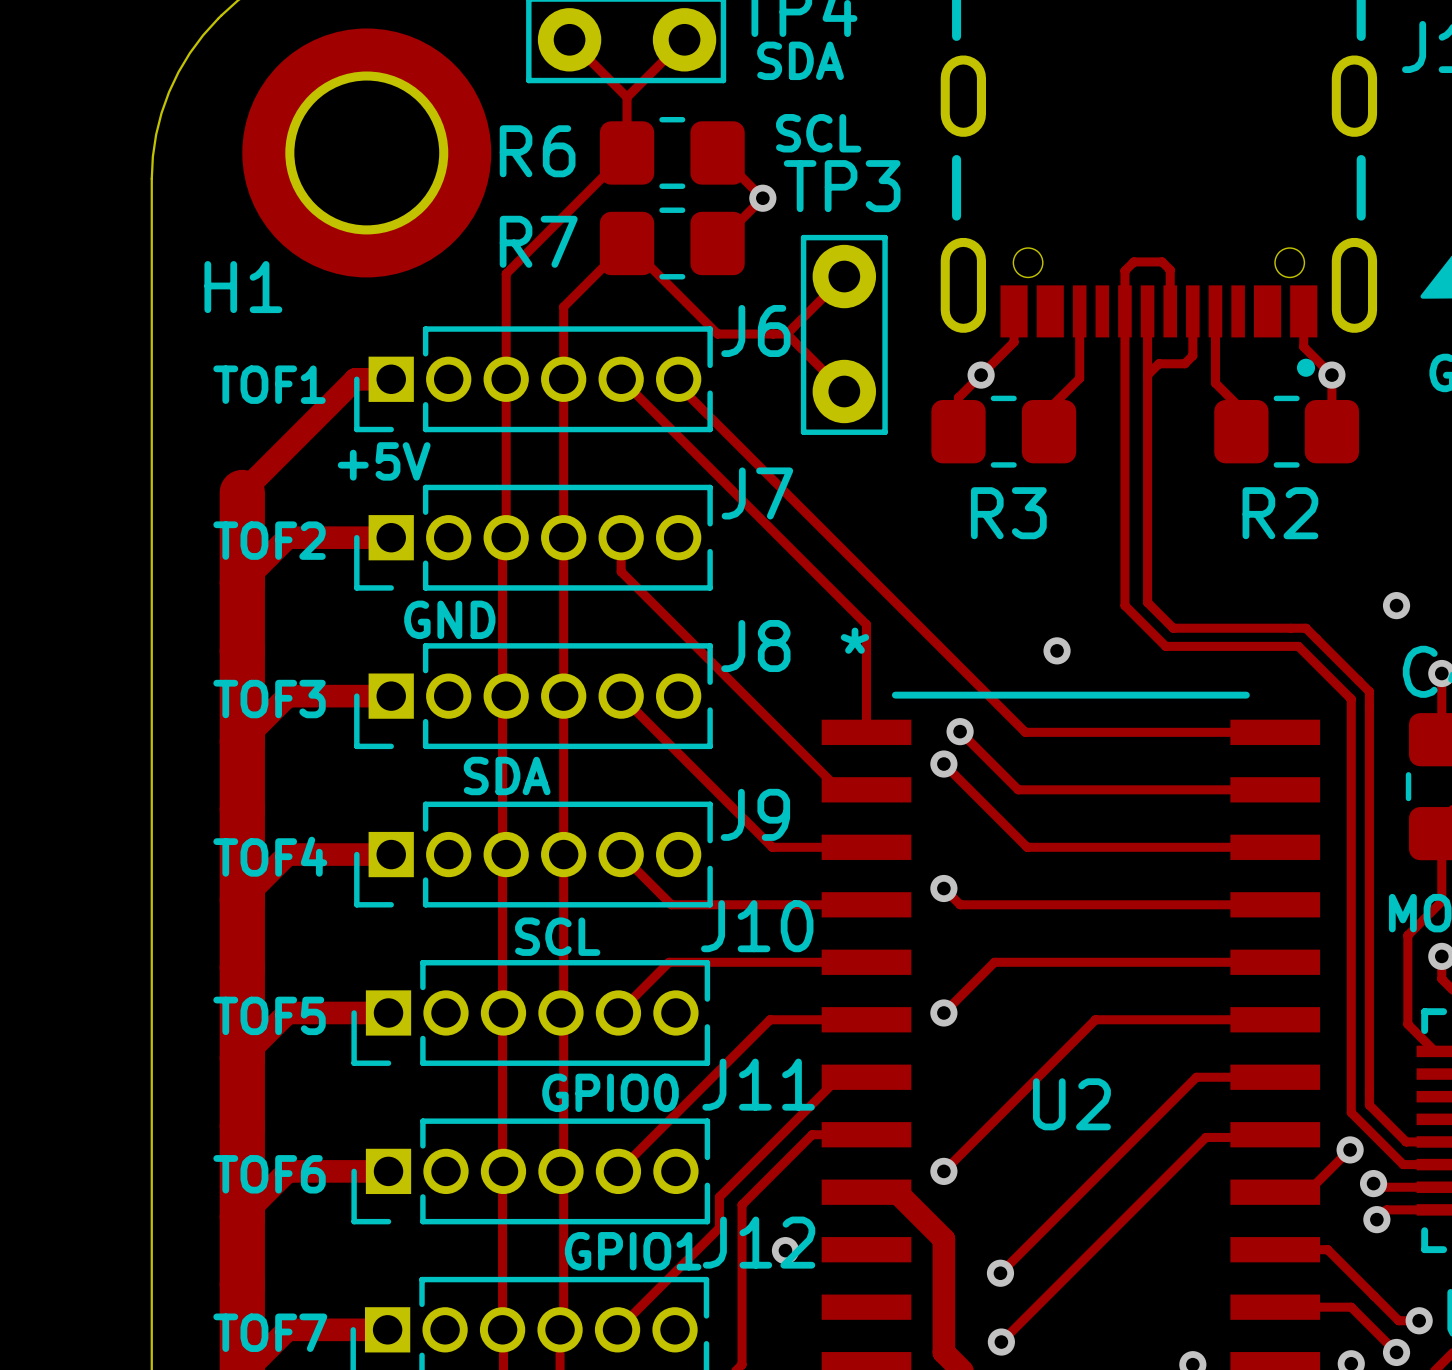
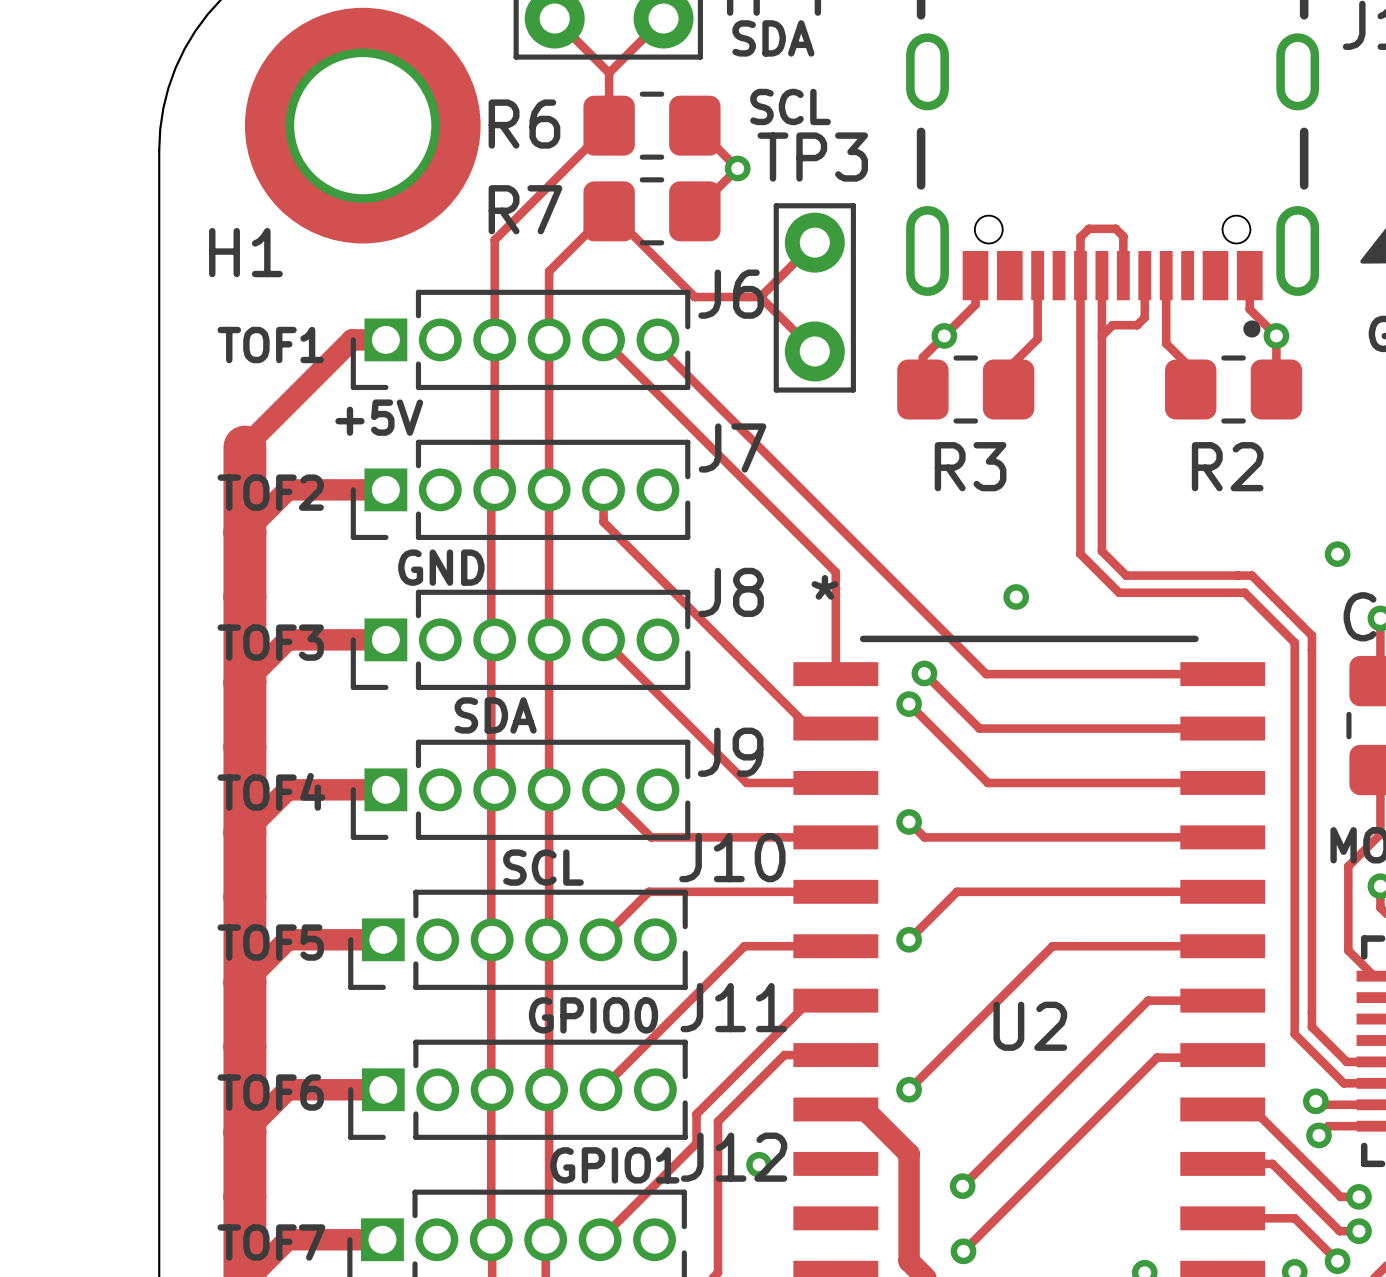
track: (1349, 1149) (1307, 1192) -> (1359, 1196) (1340, 1196) (1253, 1109)
via: (1350, 1149) -> none
via: none -> (1359, 1196)

